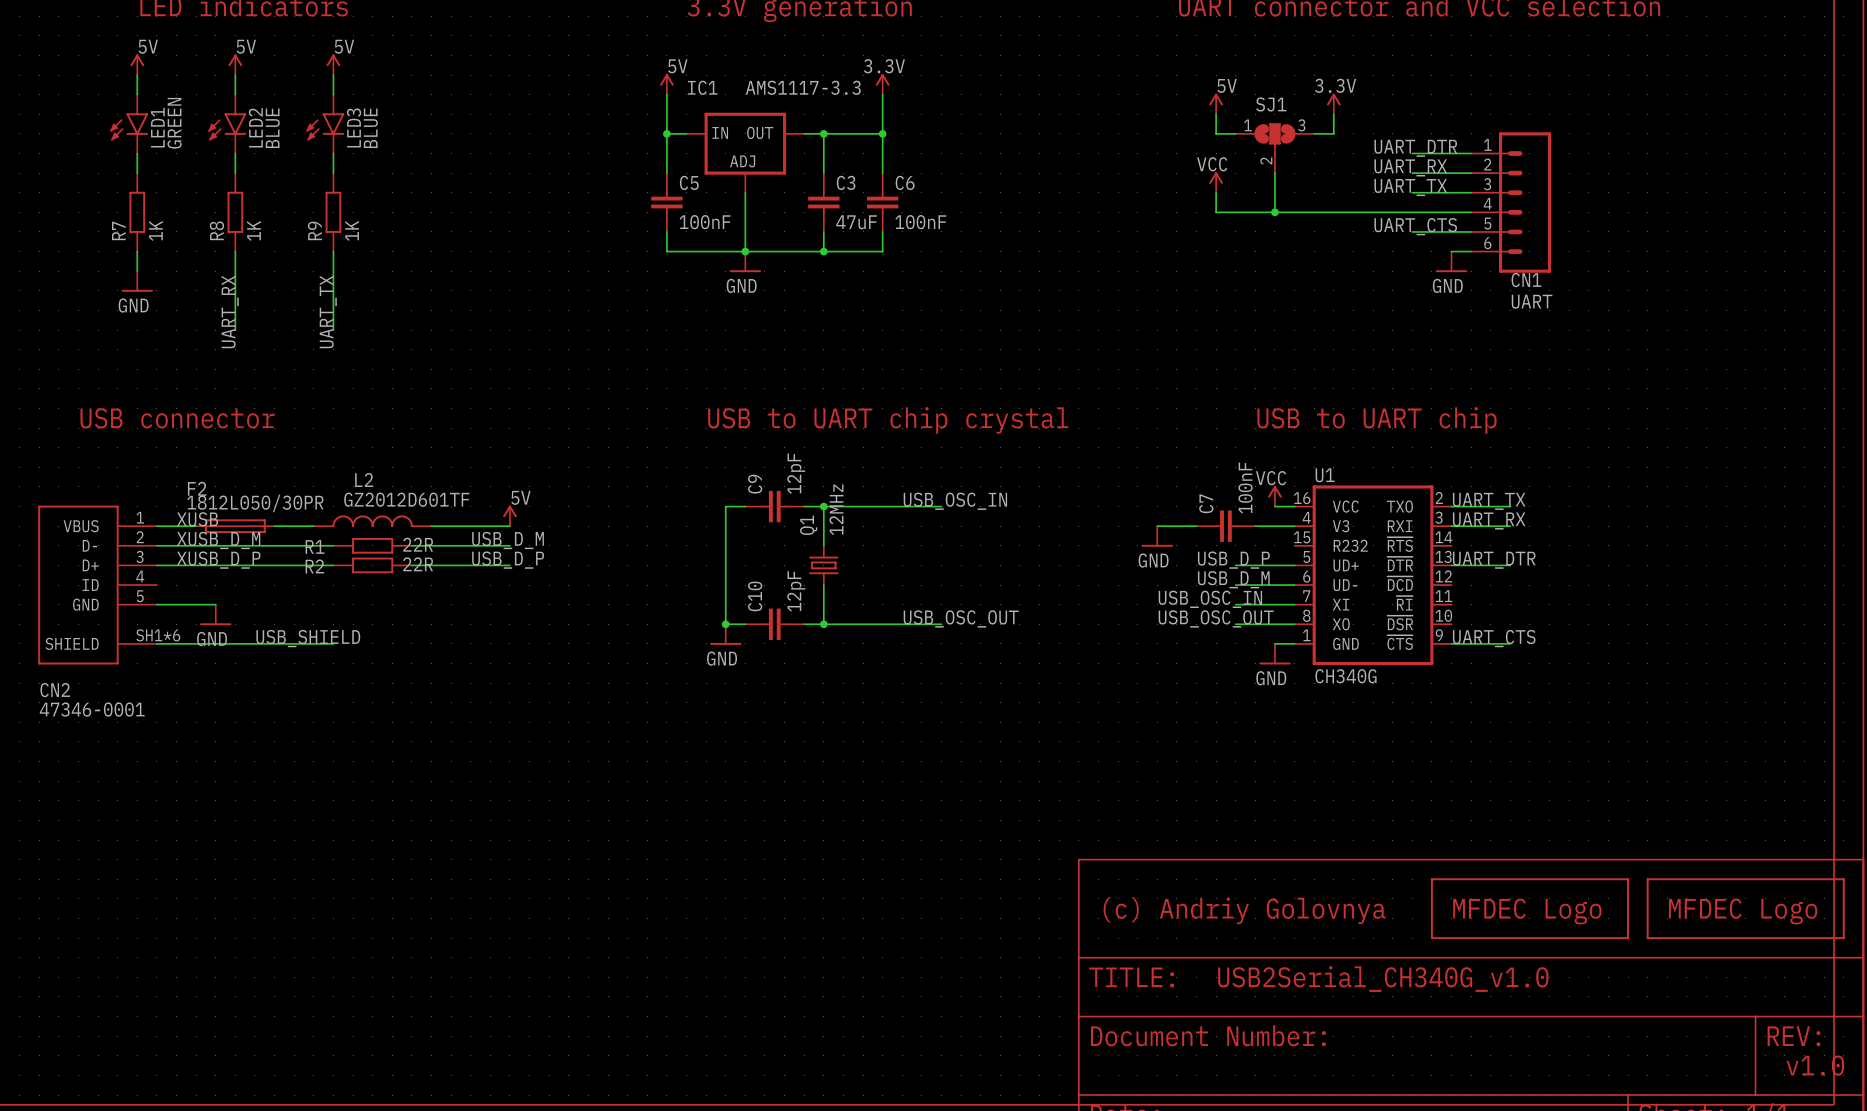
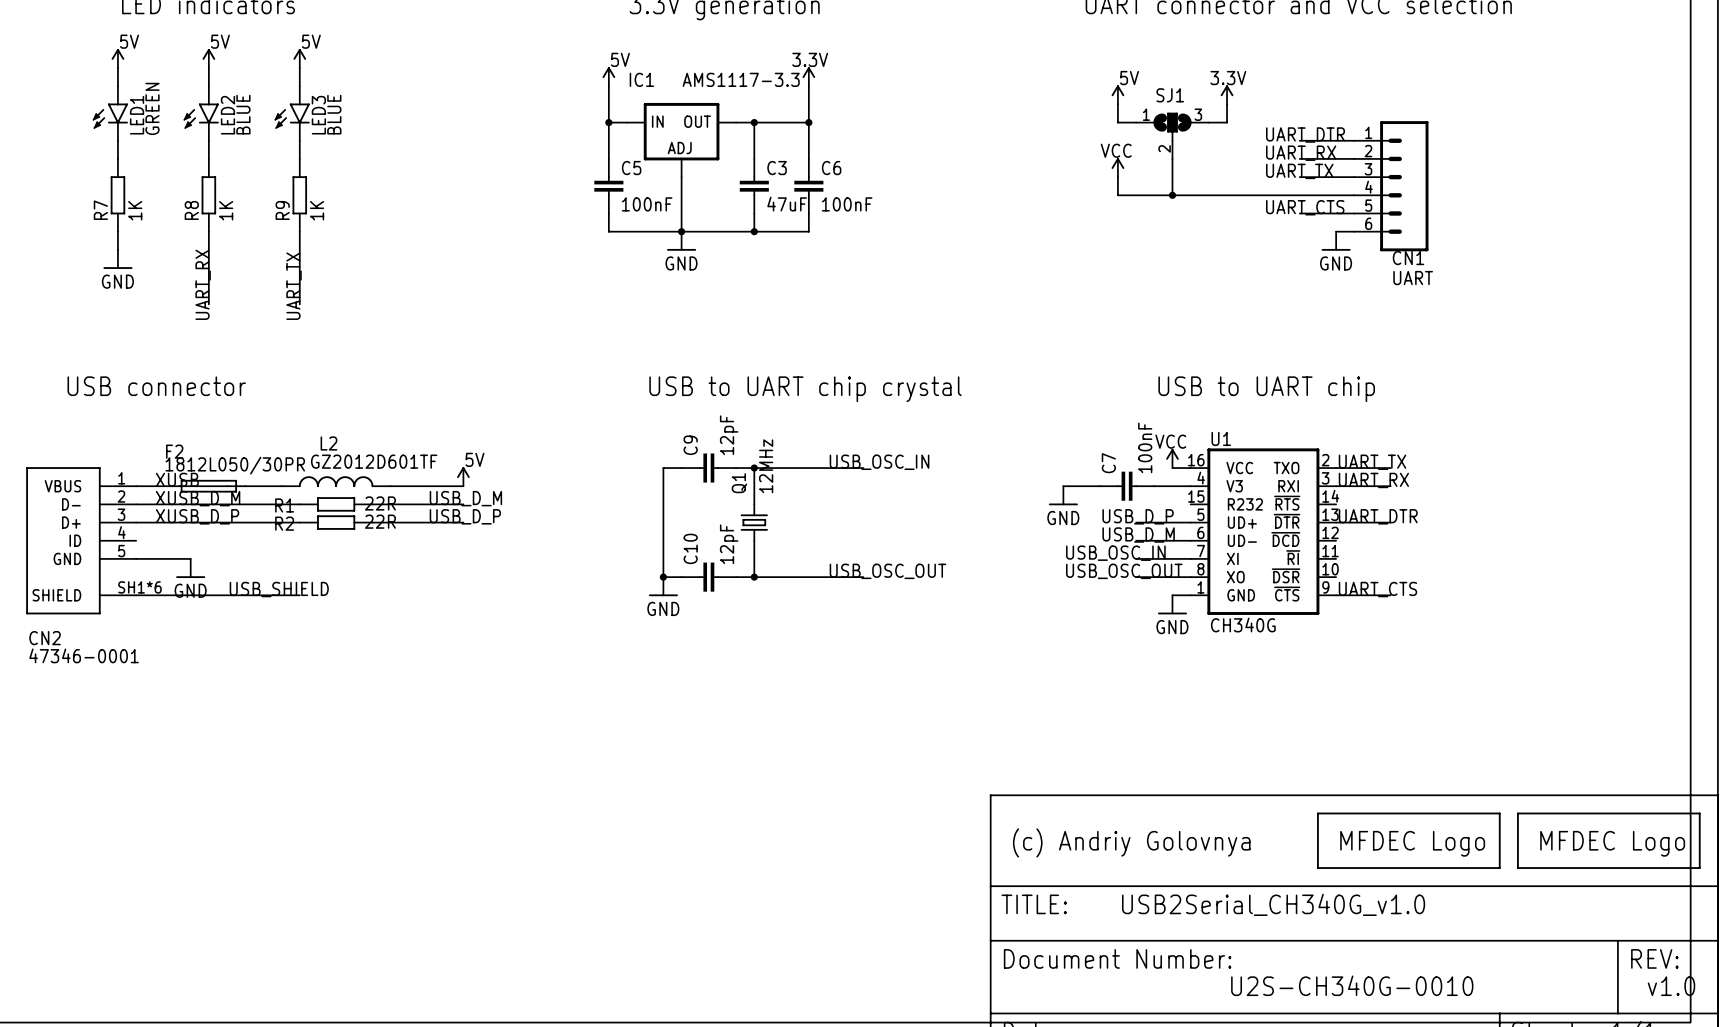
text: none -> U2S-CH340G-0010 (1352, 985)

